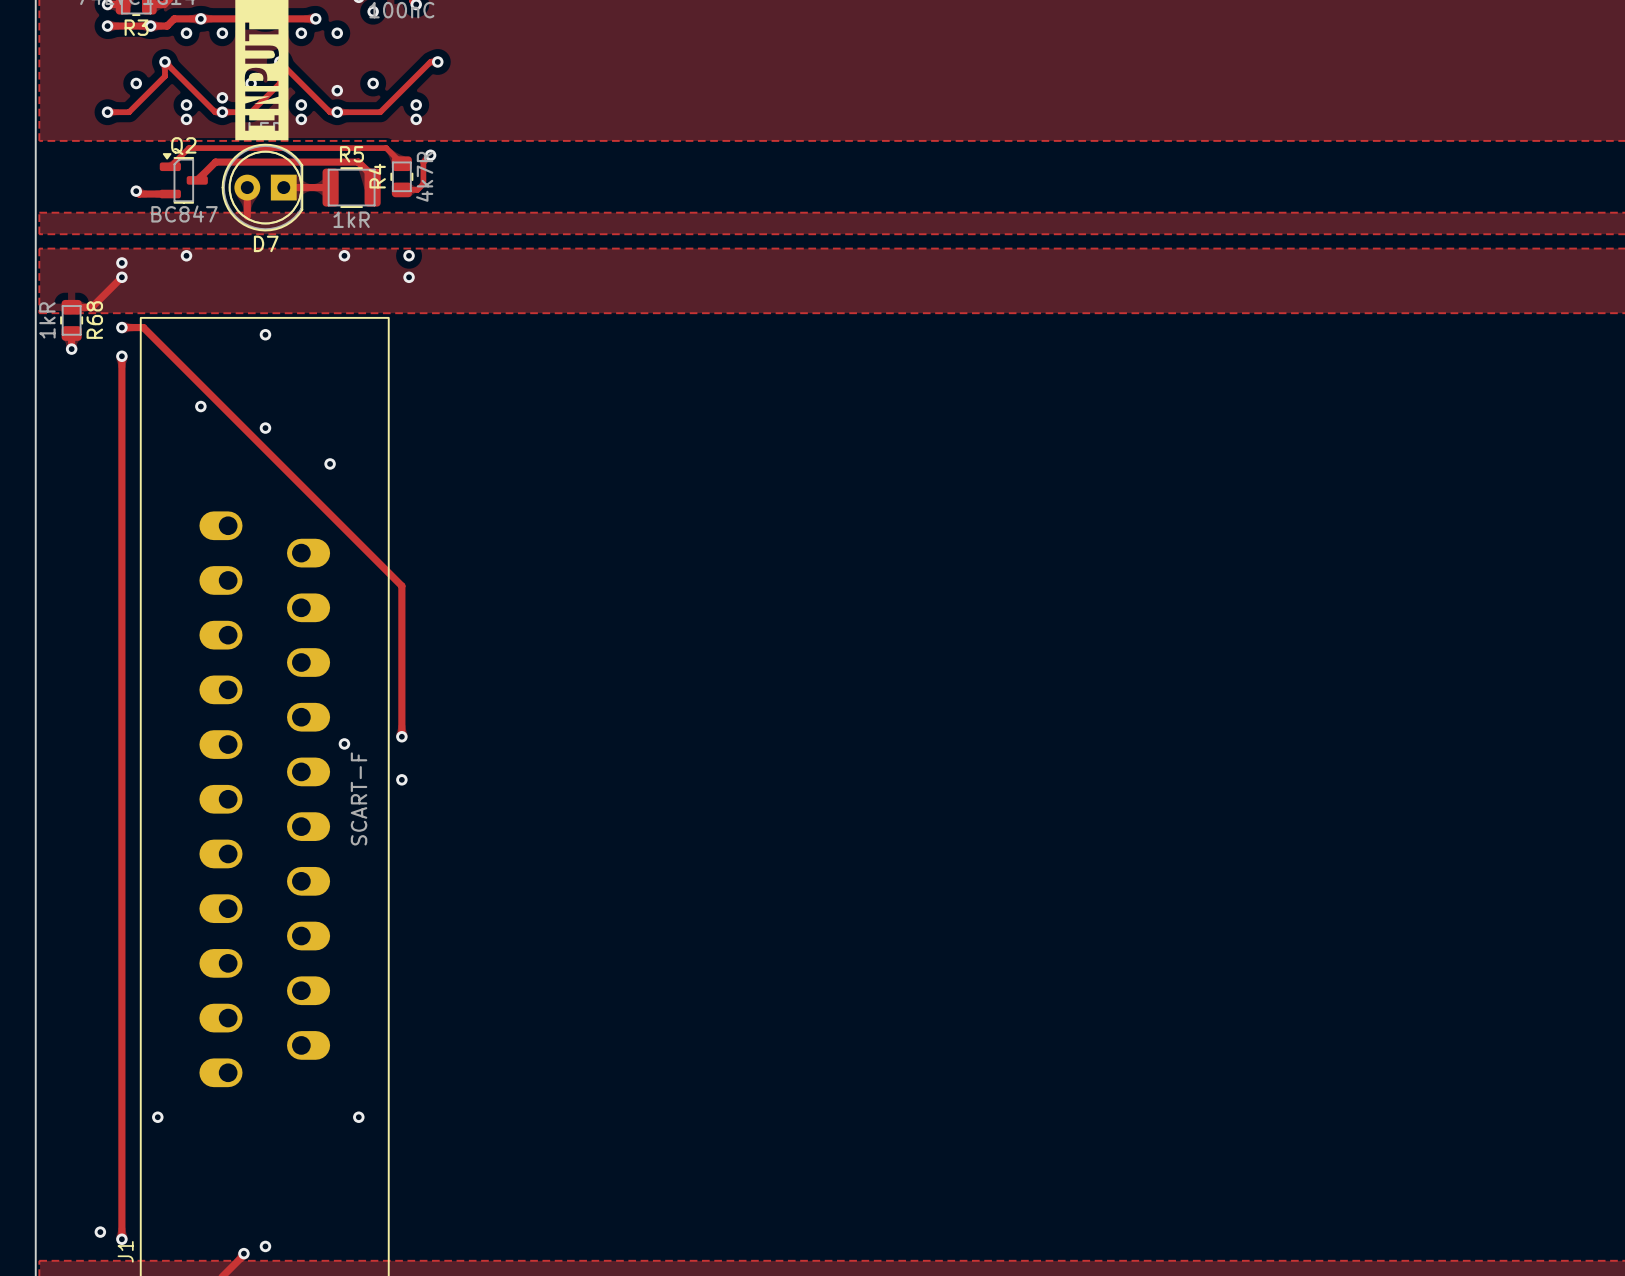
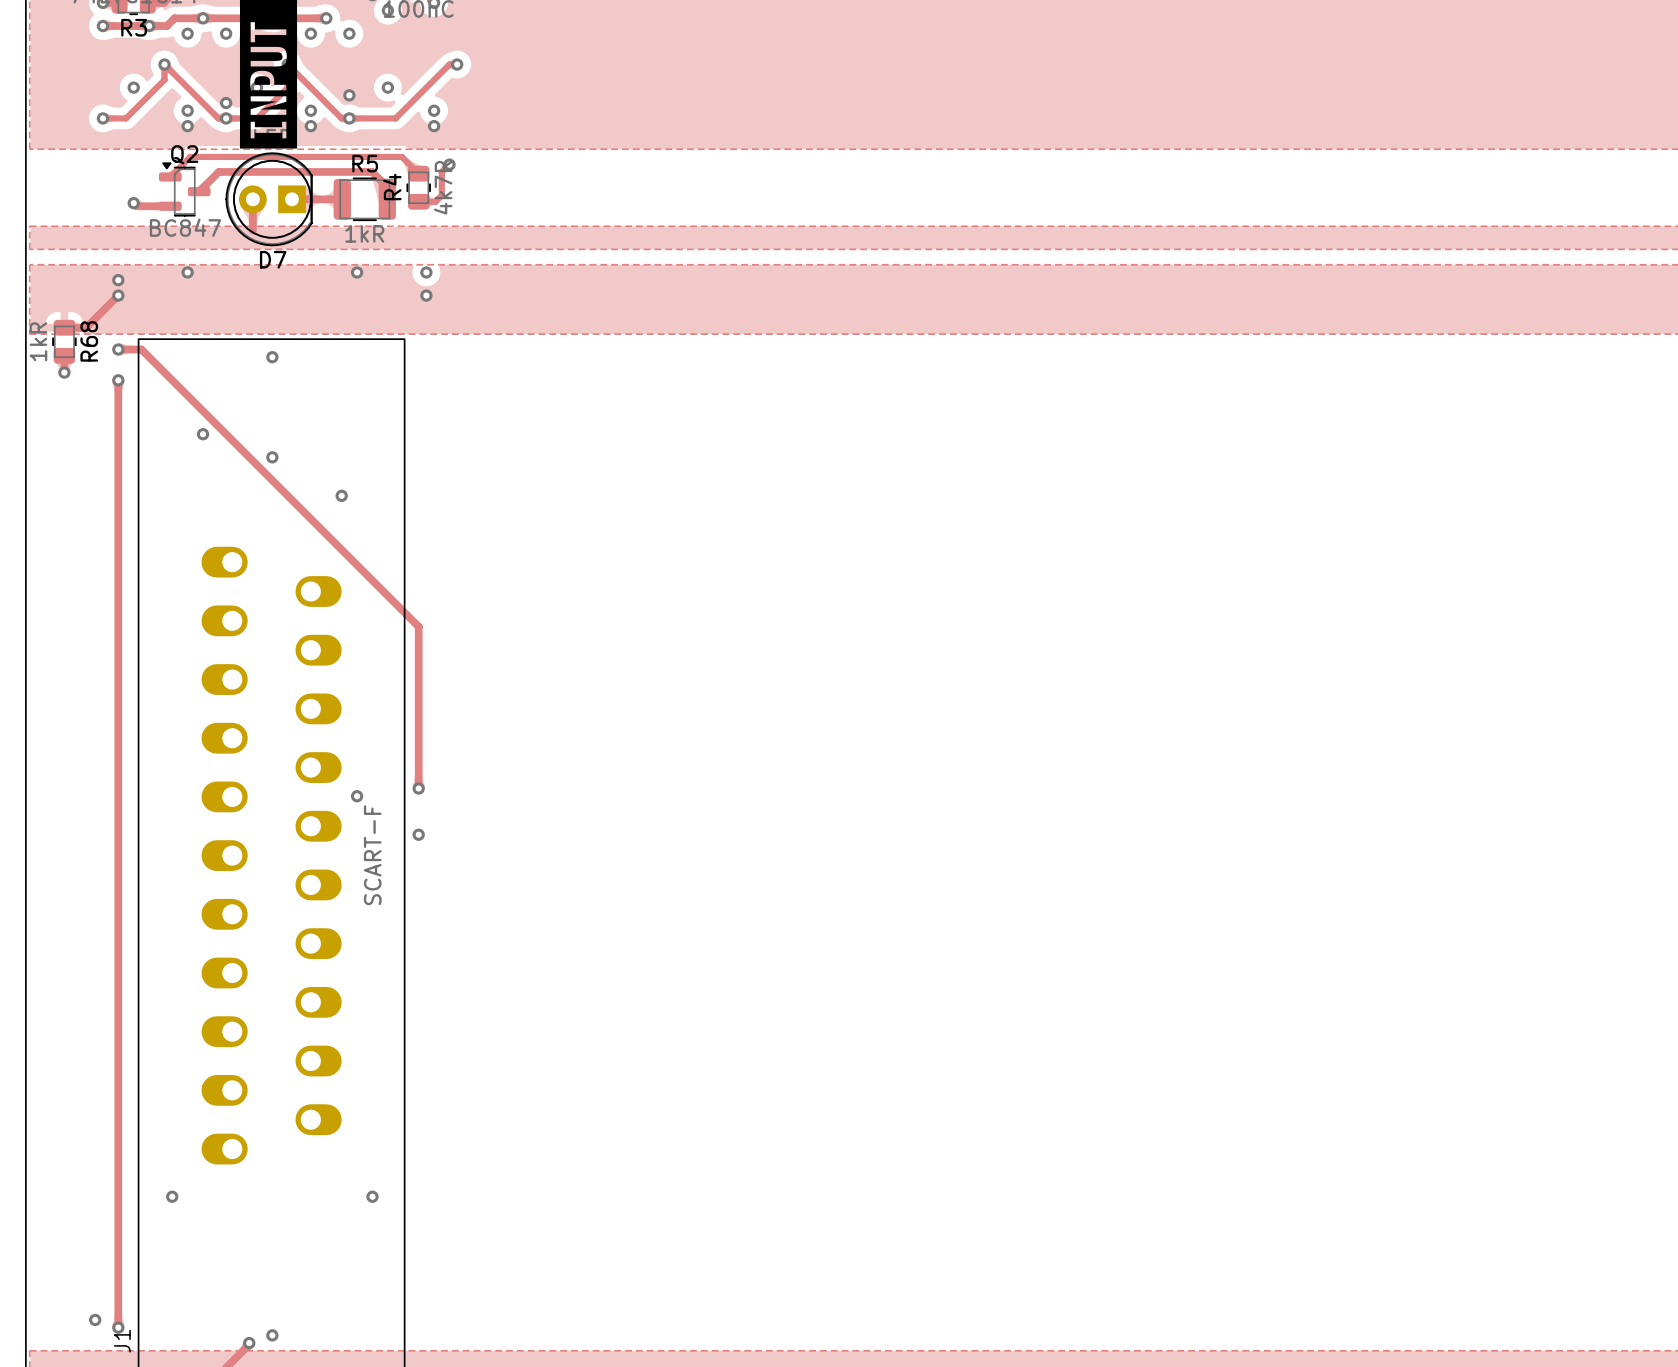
via position: (157, 1117) -> (172, 1196)

